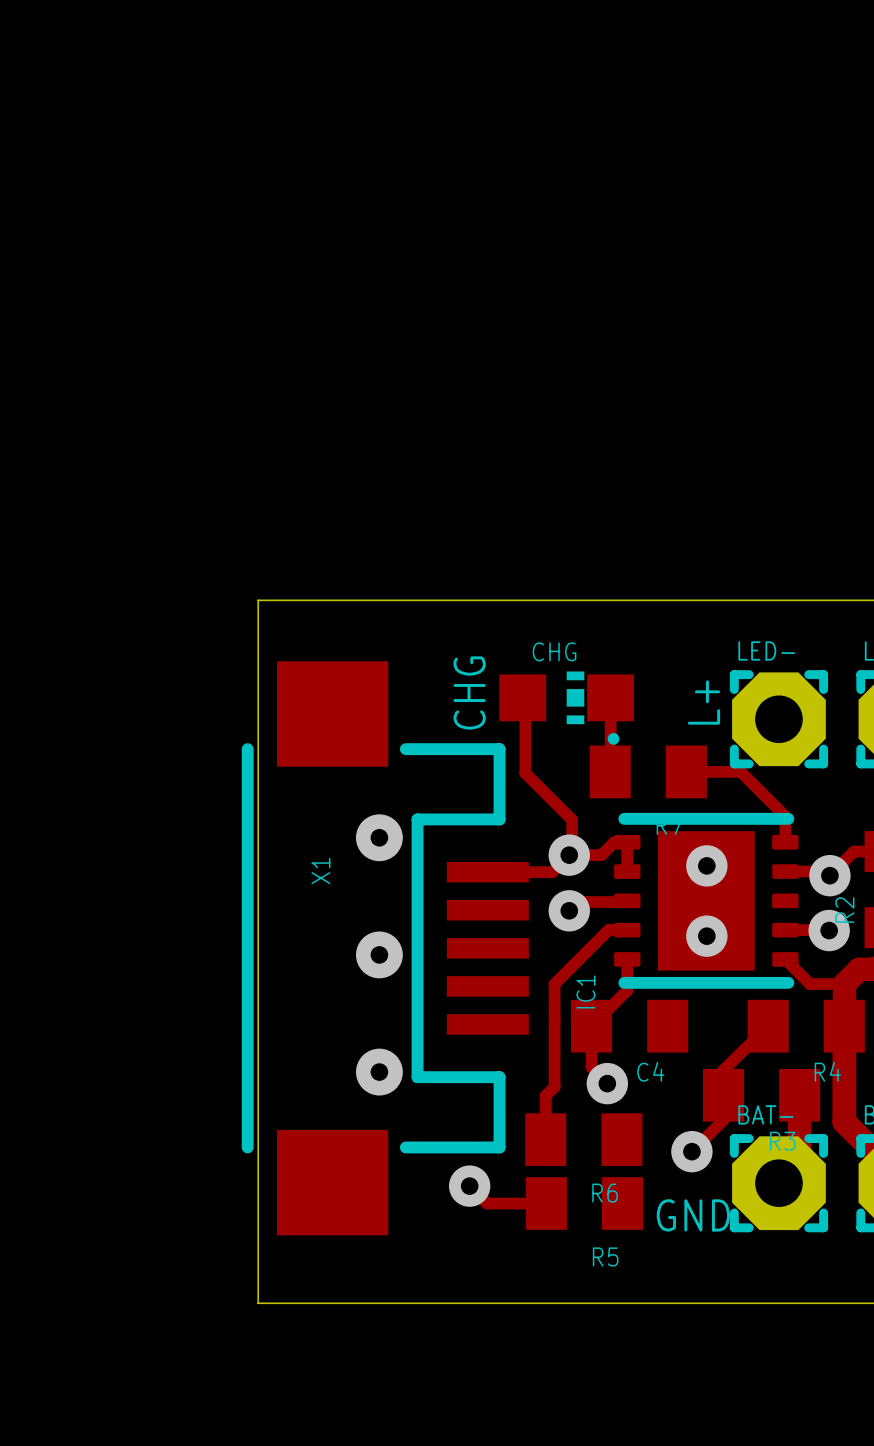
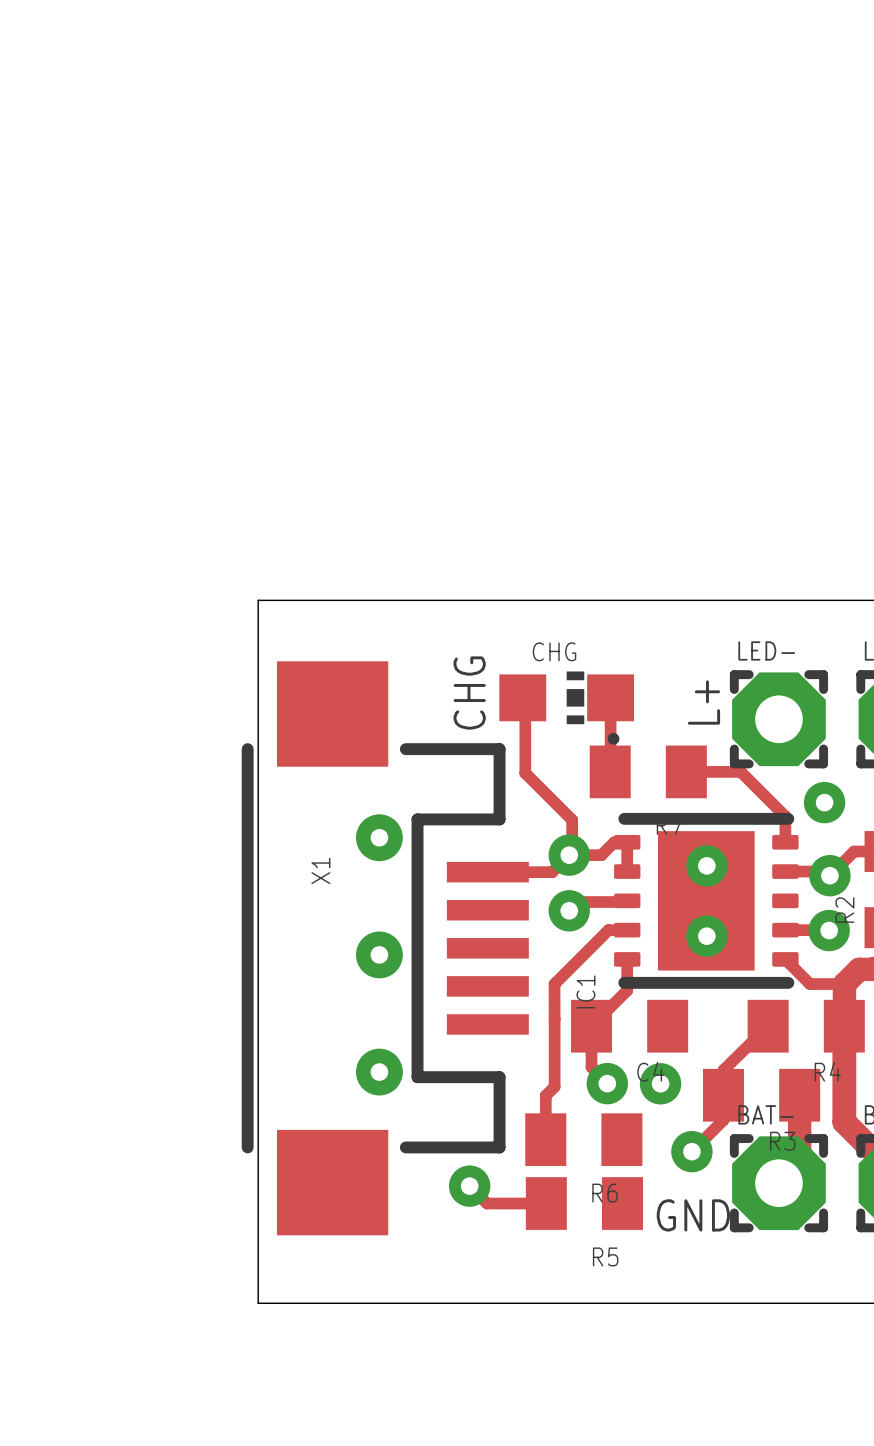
via: none -> (824, 802)
via: none -> (660, 1083)

